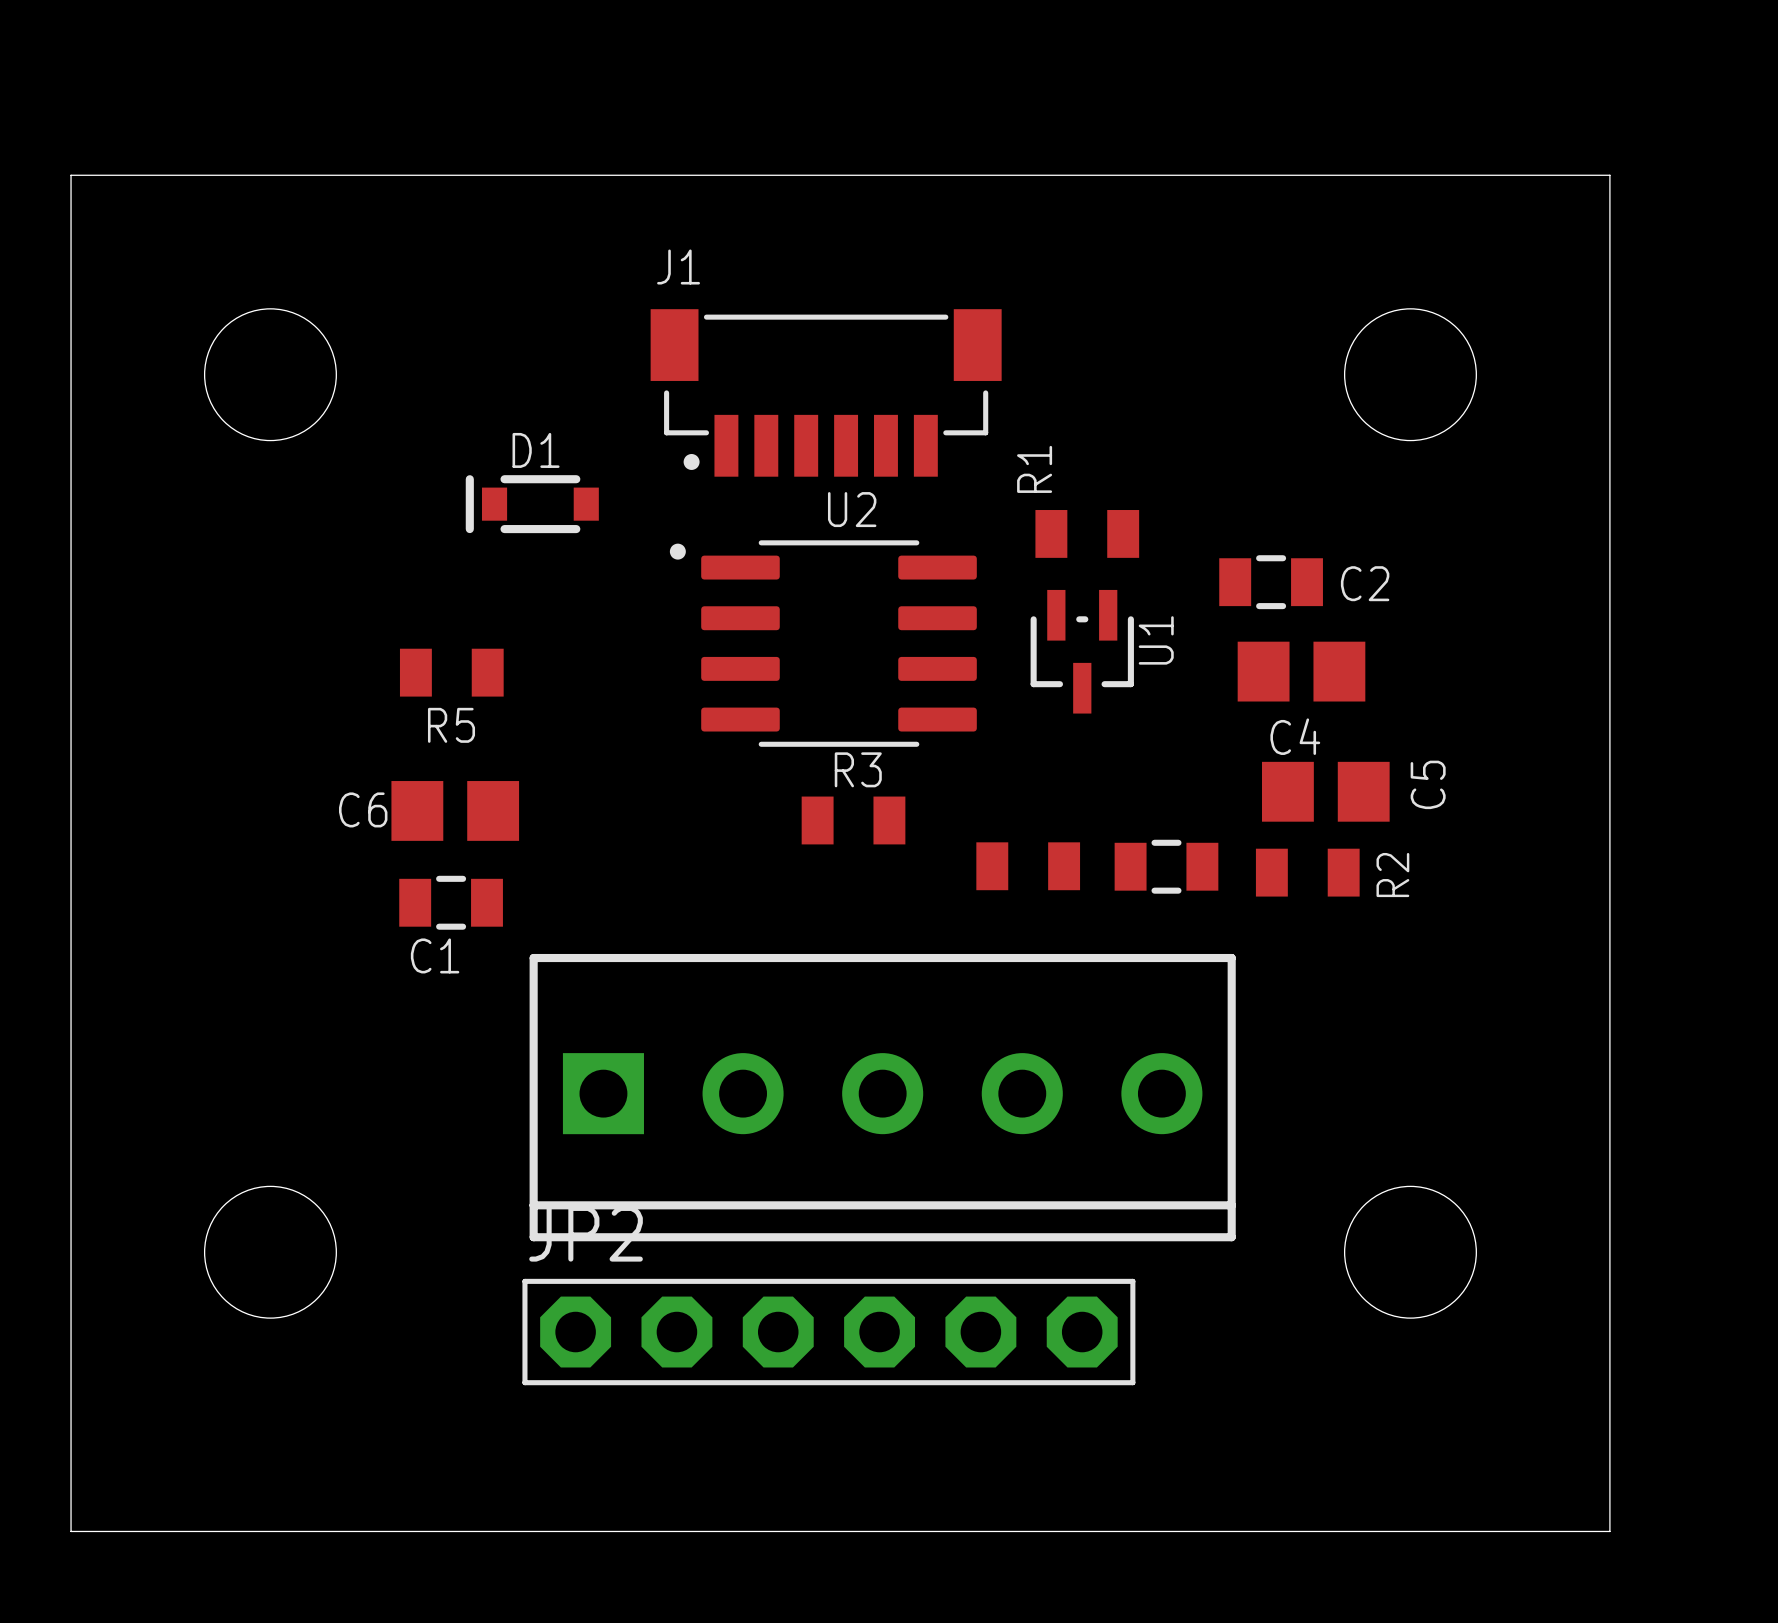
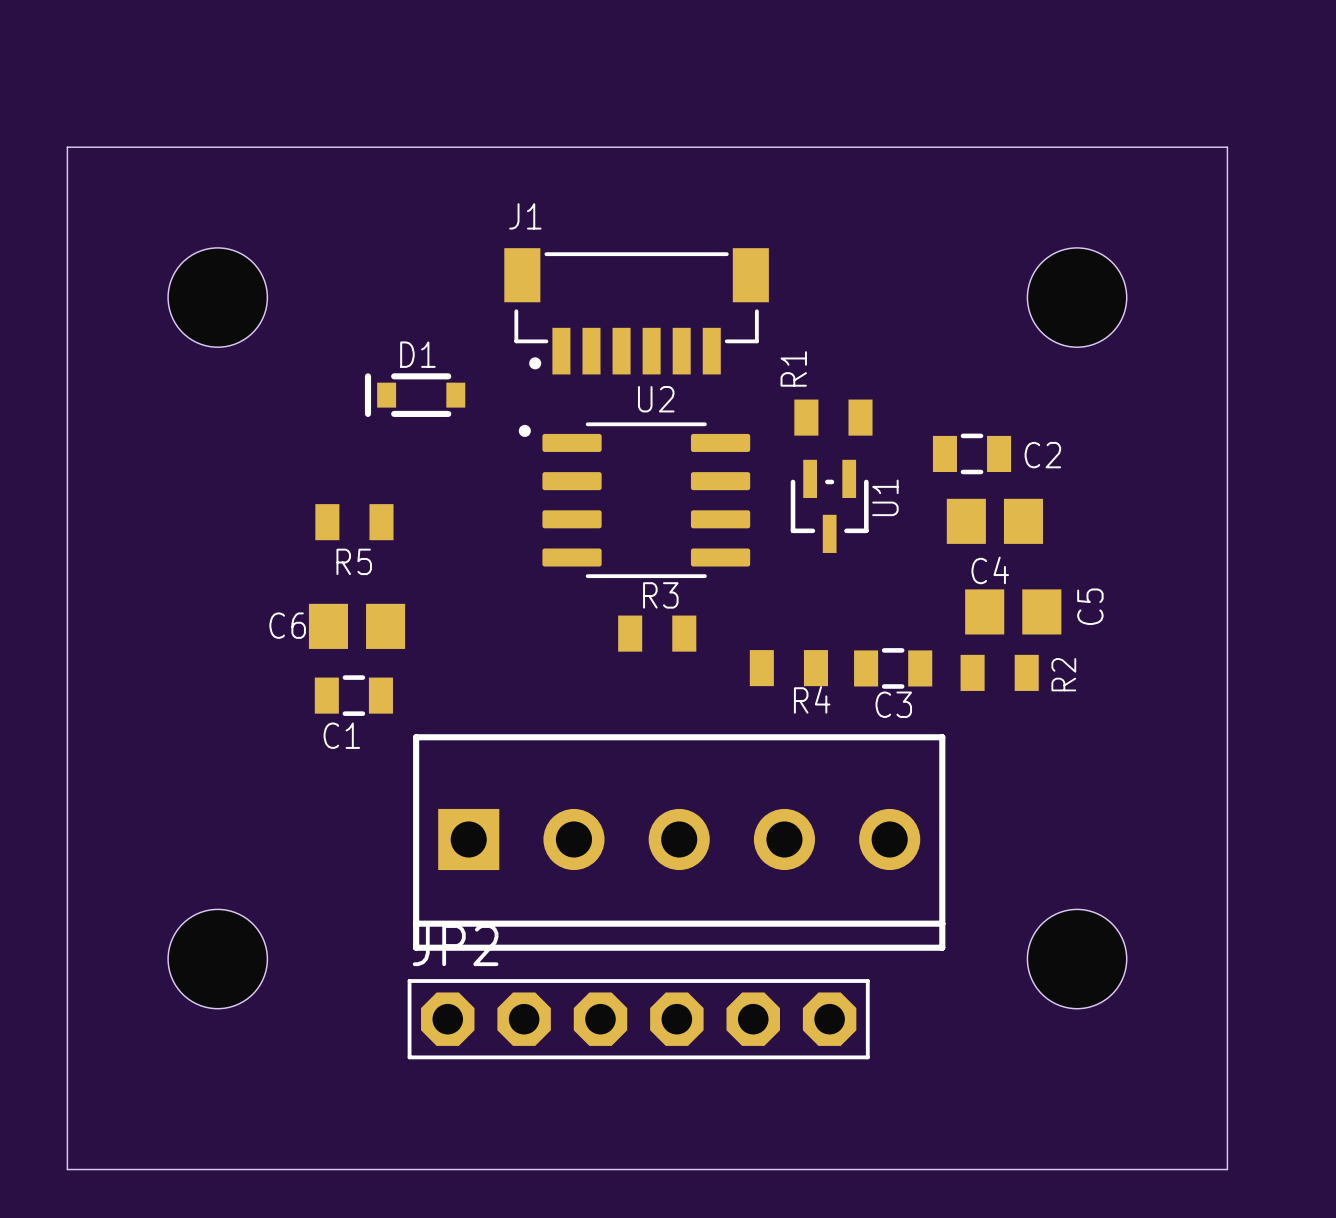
R4 name: none -> R4 (812, 699)
C3 name: none -> C3 (893, 704)

